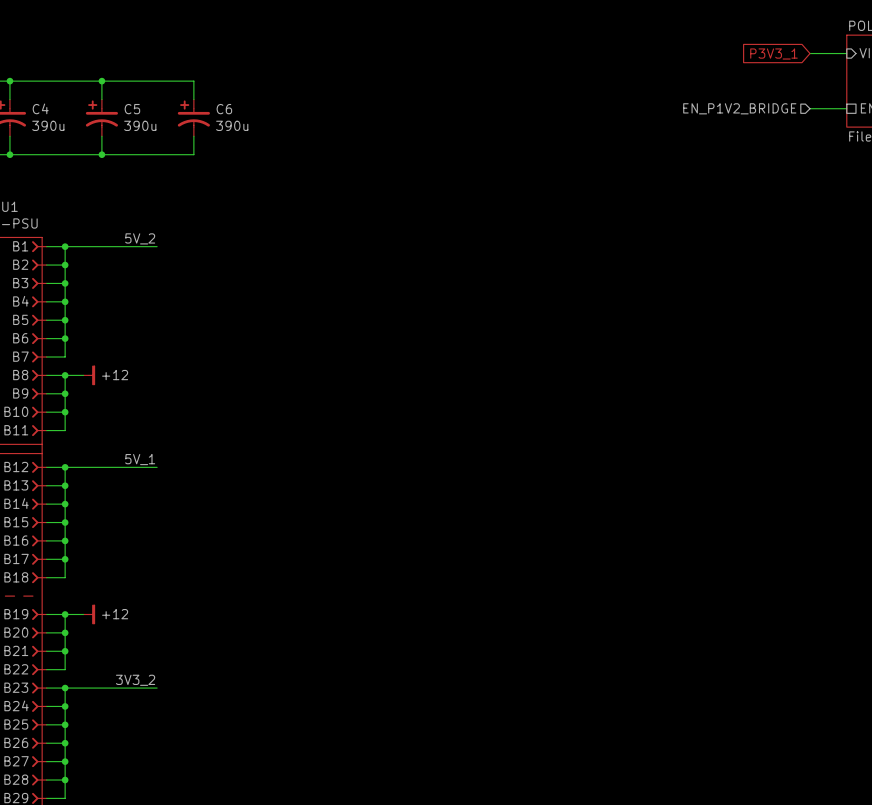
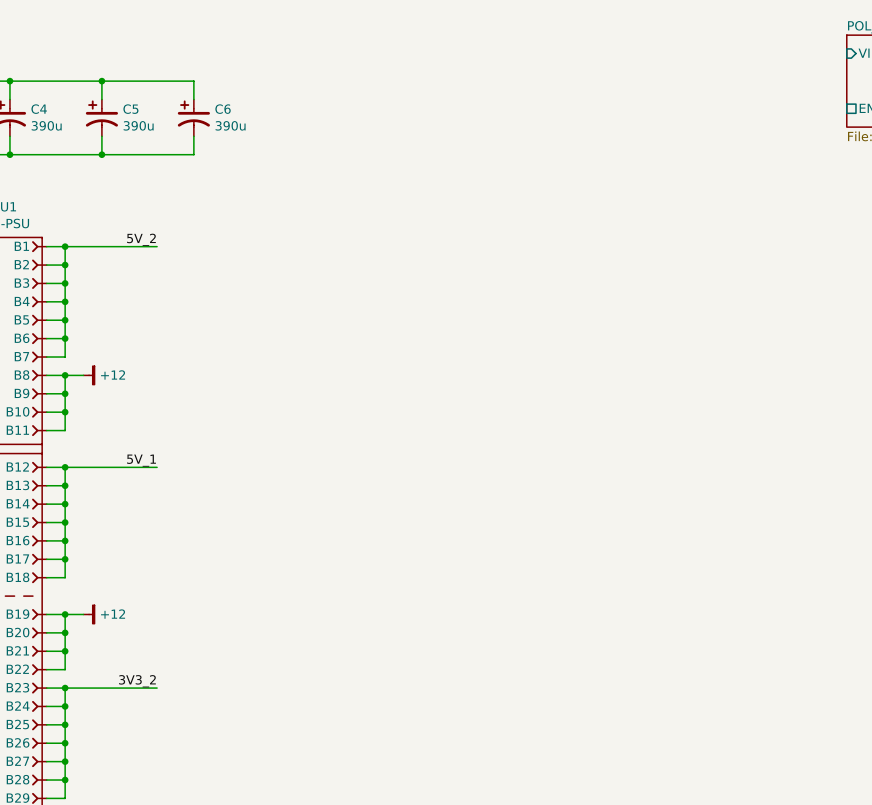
global label: P3V3_1 (773, 53) -> none
wire: (810, 53) (846, 53) -> none
hierarchical label: EN_P1V2_BRIDGE (739, 108) -> none
wire: (810, 108) (846, 108) -> none

